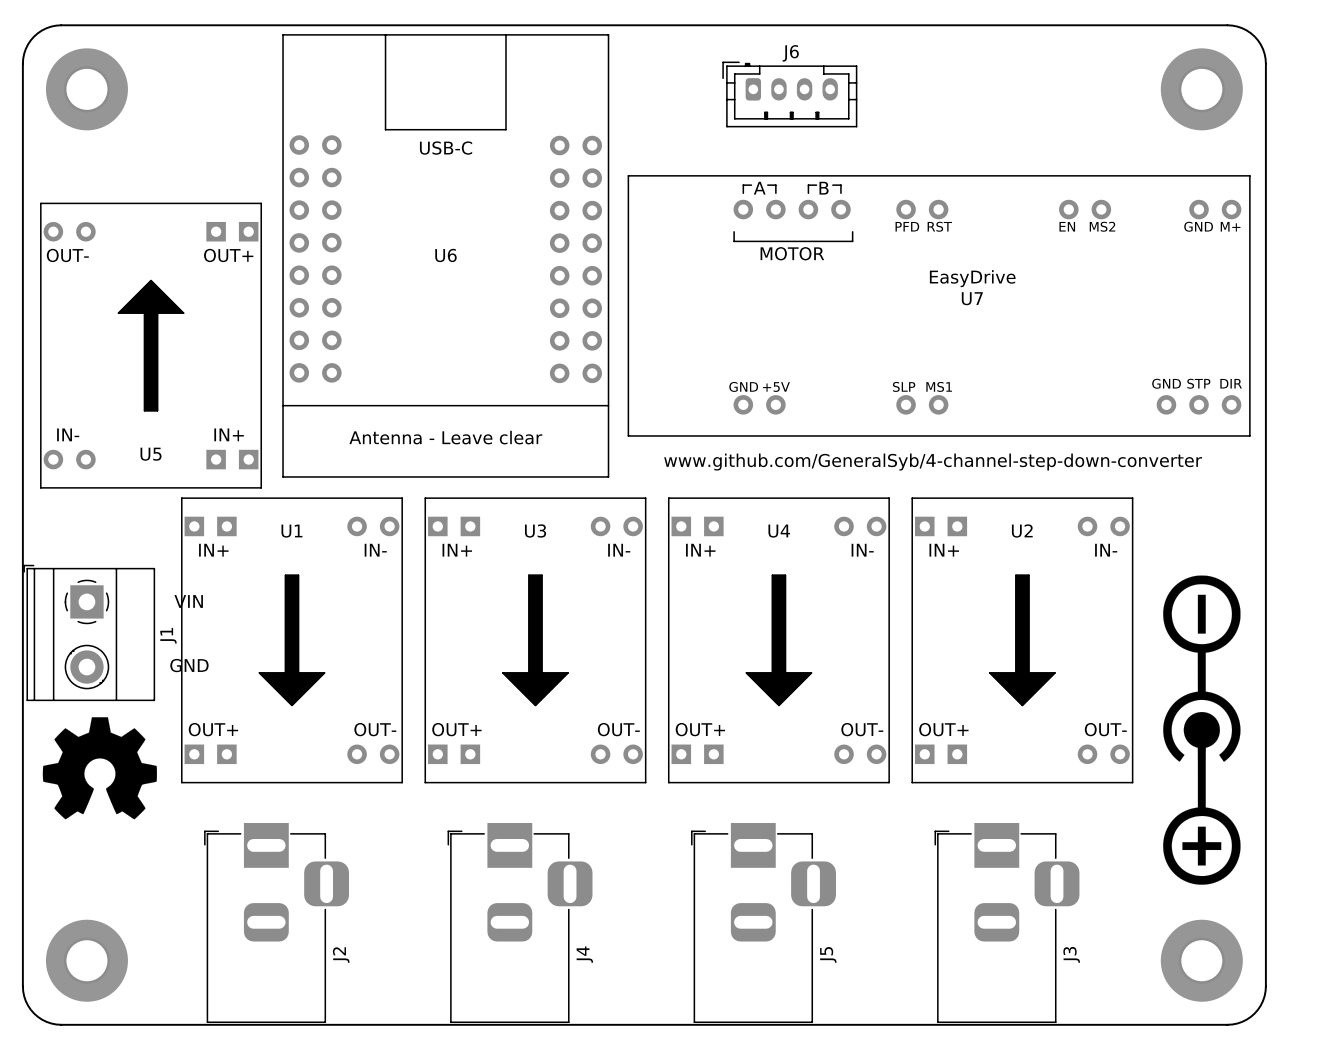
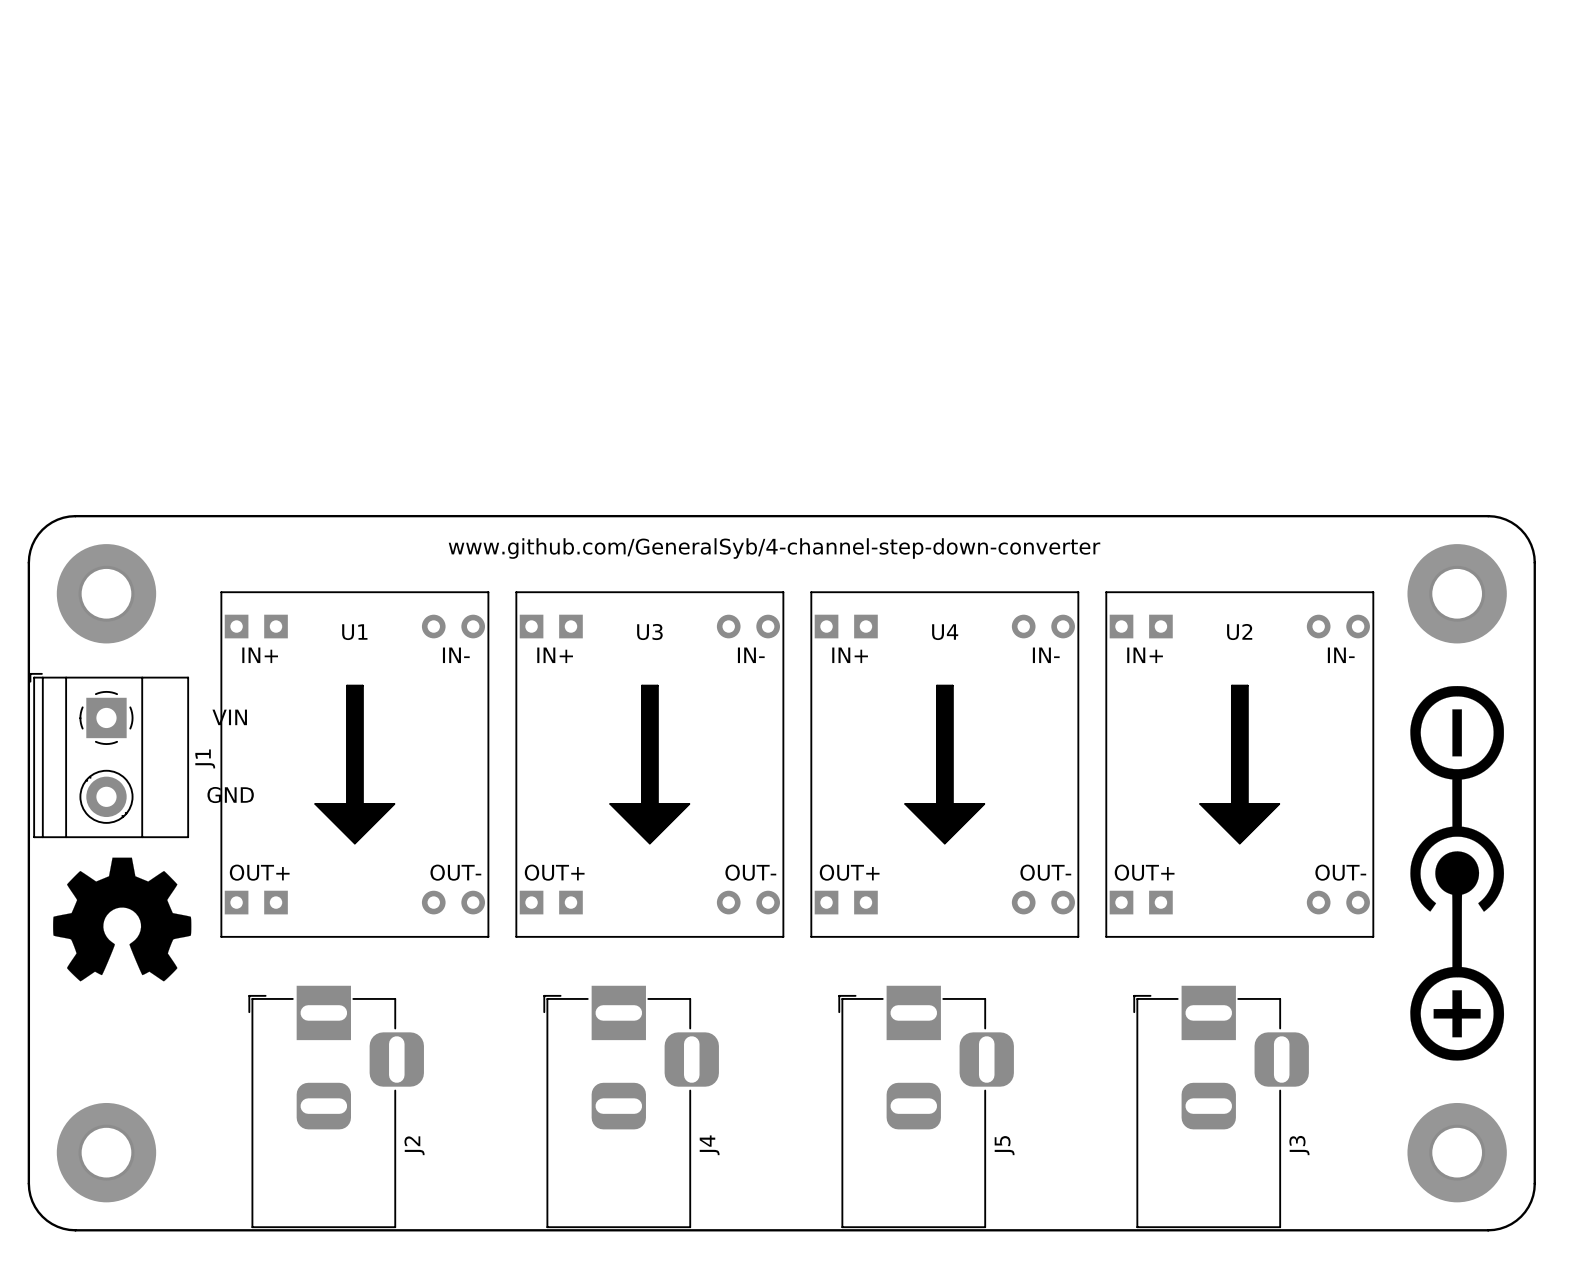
part: (86, 89) -> none
part: (1201, 89) -> none
J6: (789, 94) -> none
U6: (445, 255) -> none
U7: EasyDrive (939, 305) -> none
U5: (151, 345) -> none
text position: www.github.com/GeneralSyb/4-channel-step-down-converter (933, 462) -> www.github.com/GeneralSyb/4-channel-step-down-converter (774, 548)
board edge: (22, 473) (23, 58) (28, 44) (34, 36) (46, 28) (61, 25) (1227, 25) (1242, 28) (1257, 40) (1262, 49) (1265, 63) (1265, 473) -> (28, 562) (32, 544) (42, 529) (57, 519) (75, 516) (1488, 516) (1506, 519) (1521, 529) (1531, 544) (1534, 562)
part: none -> (106, 593)
part: none -> (1457, 593)

